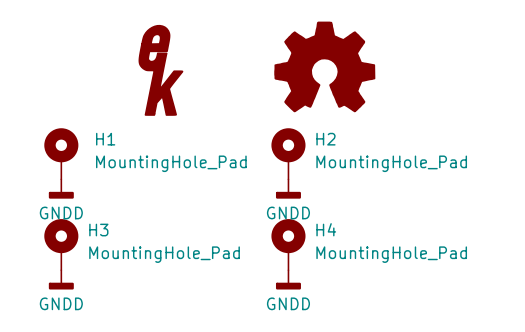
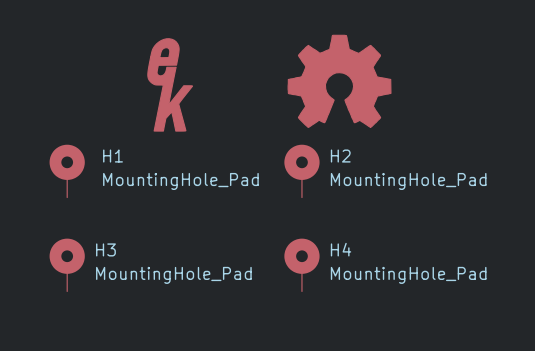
power symbol: GNDD (61, 189) -> none
power symbol: GNDD (288, 189) -> none
power symbol: GNDD (61, 279) -> none
power symbol: GNDD (288, 279) -> none

